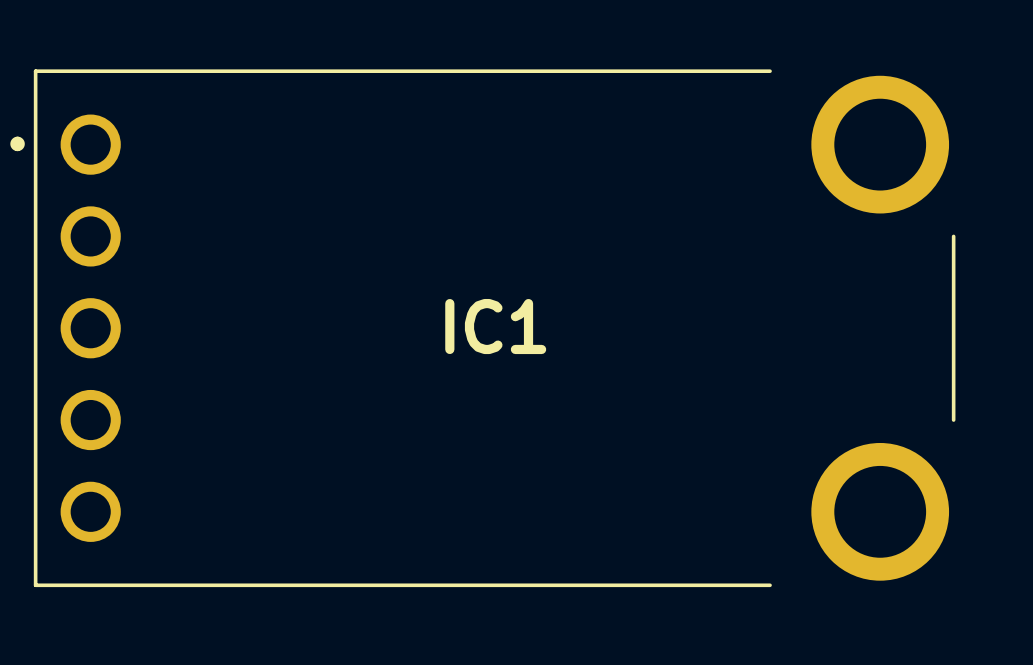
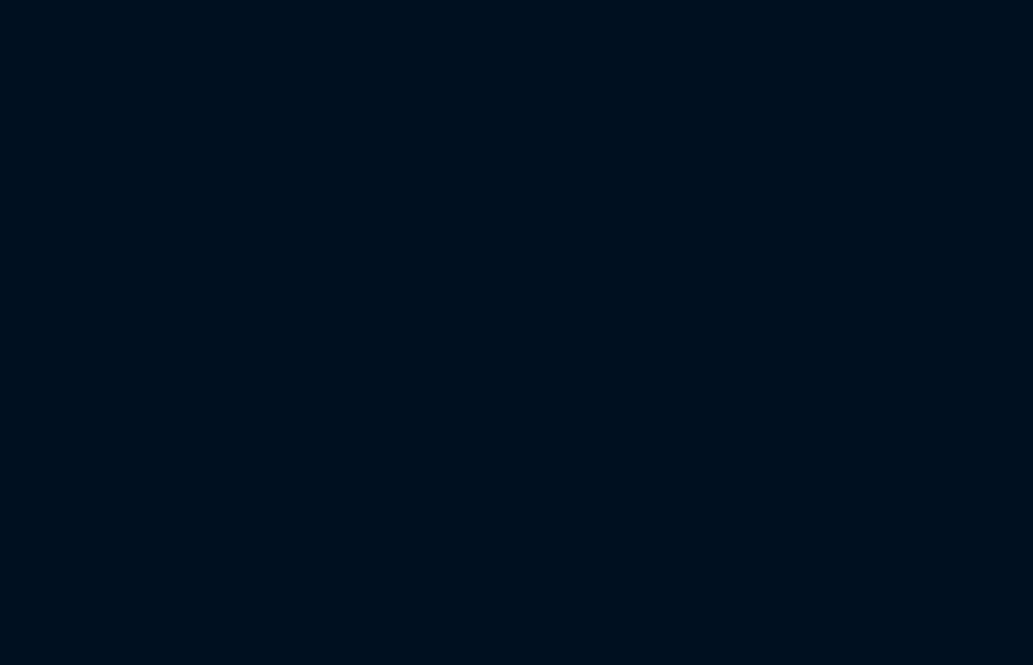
IC1: (482, 328) -> none

